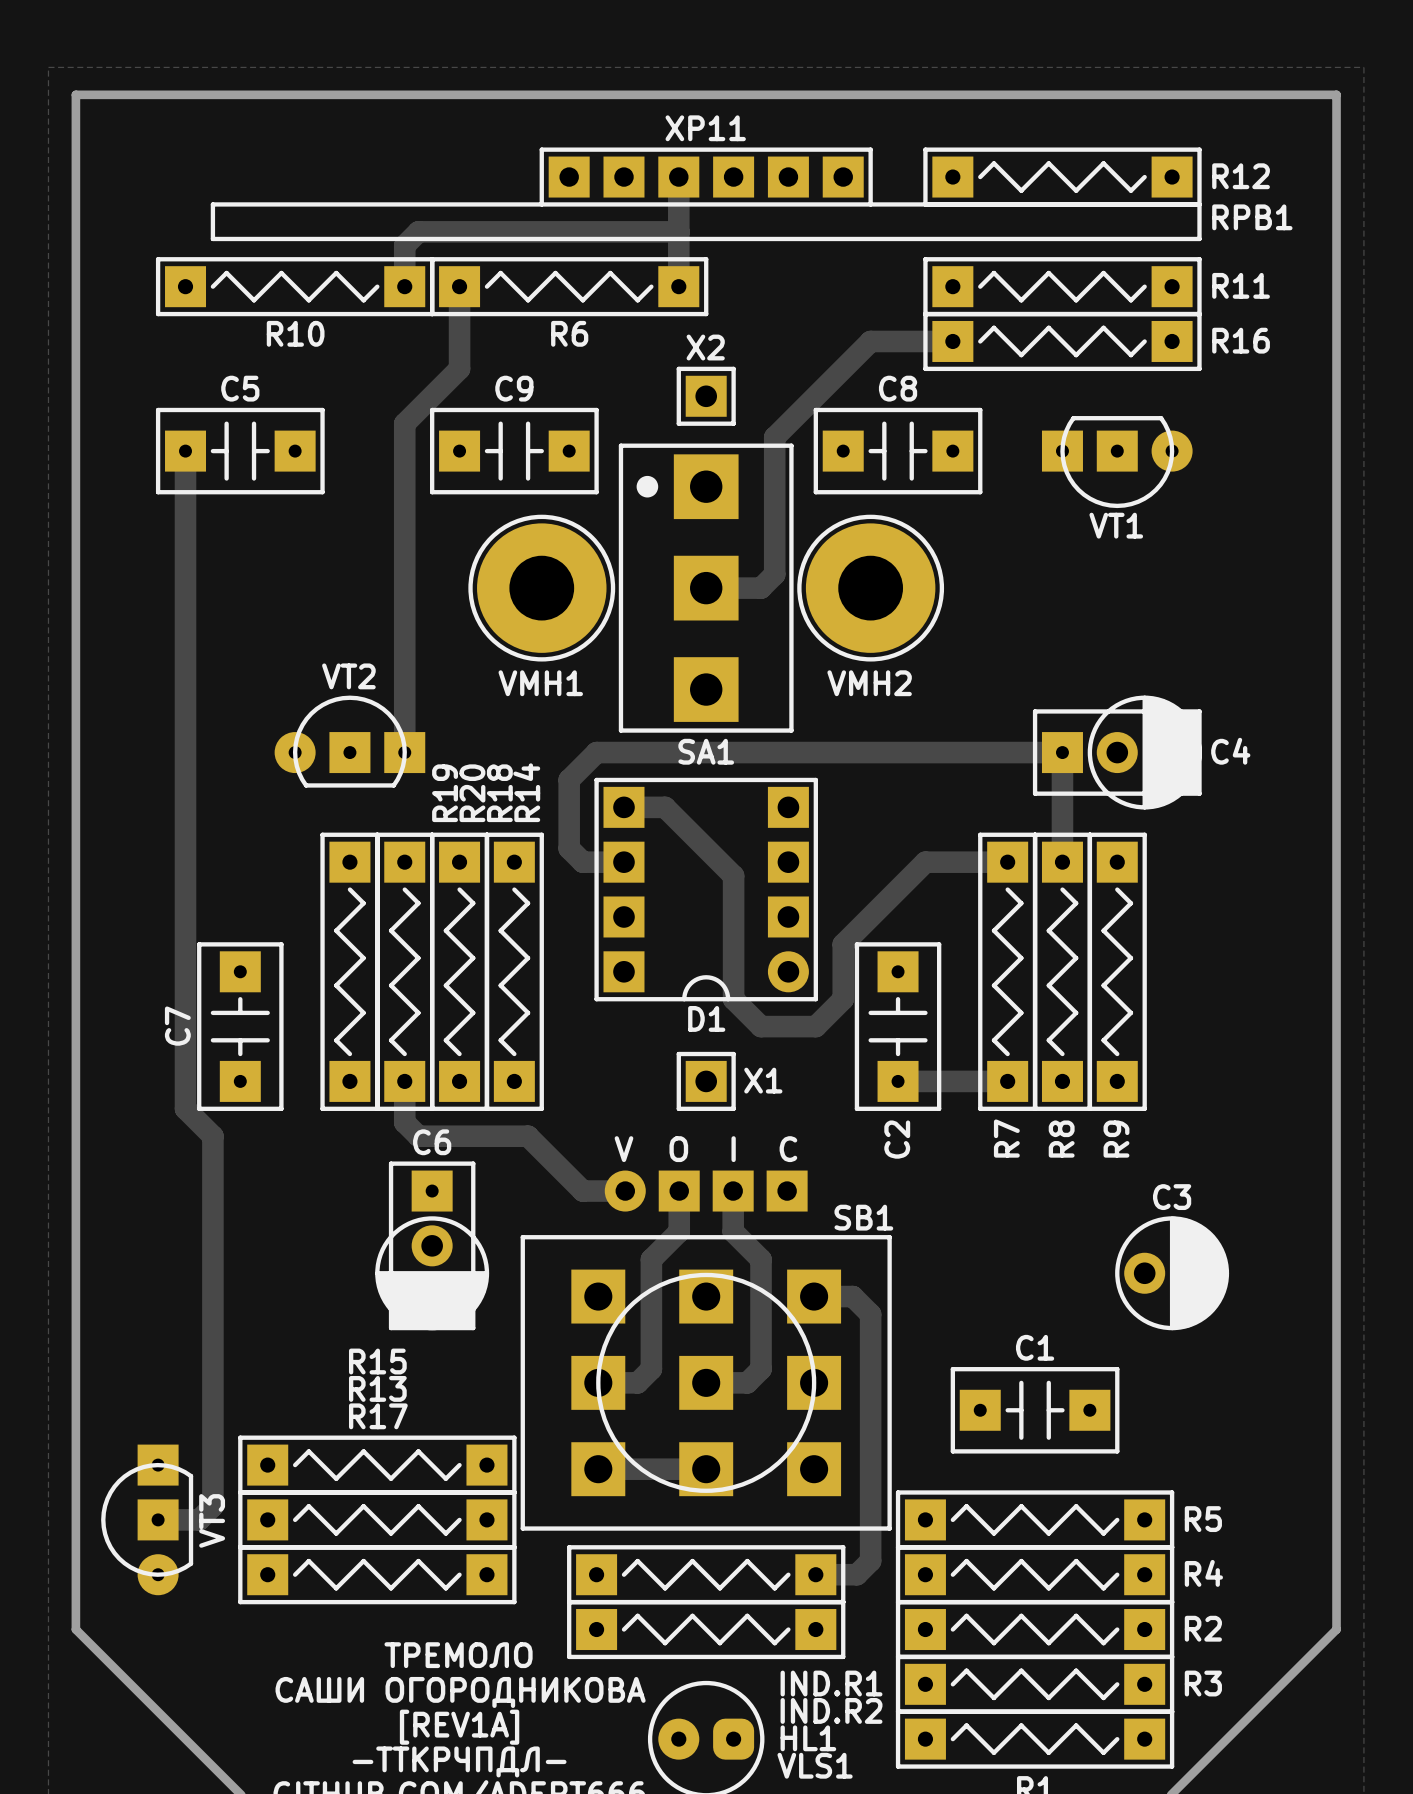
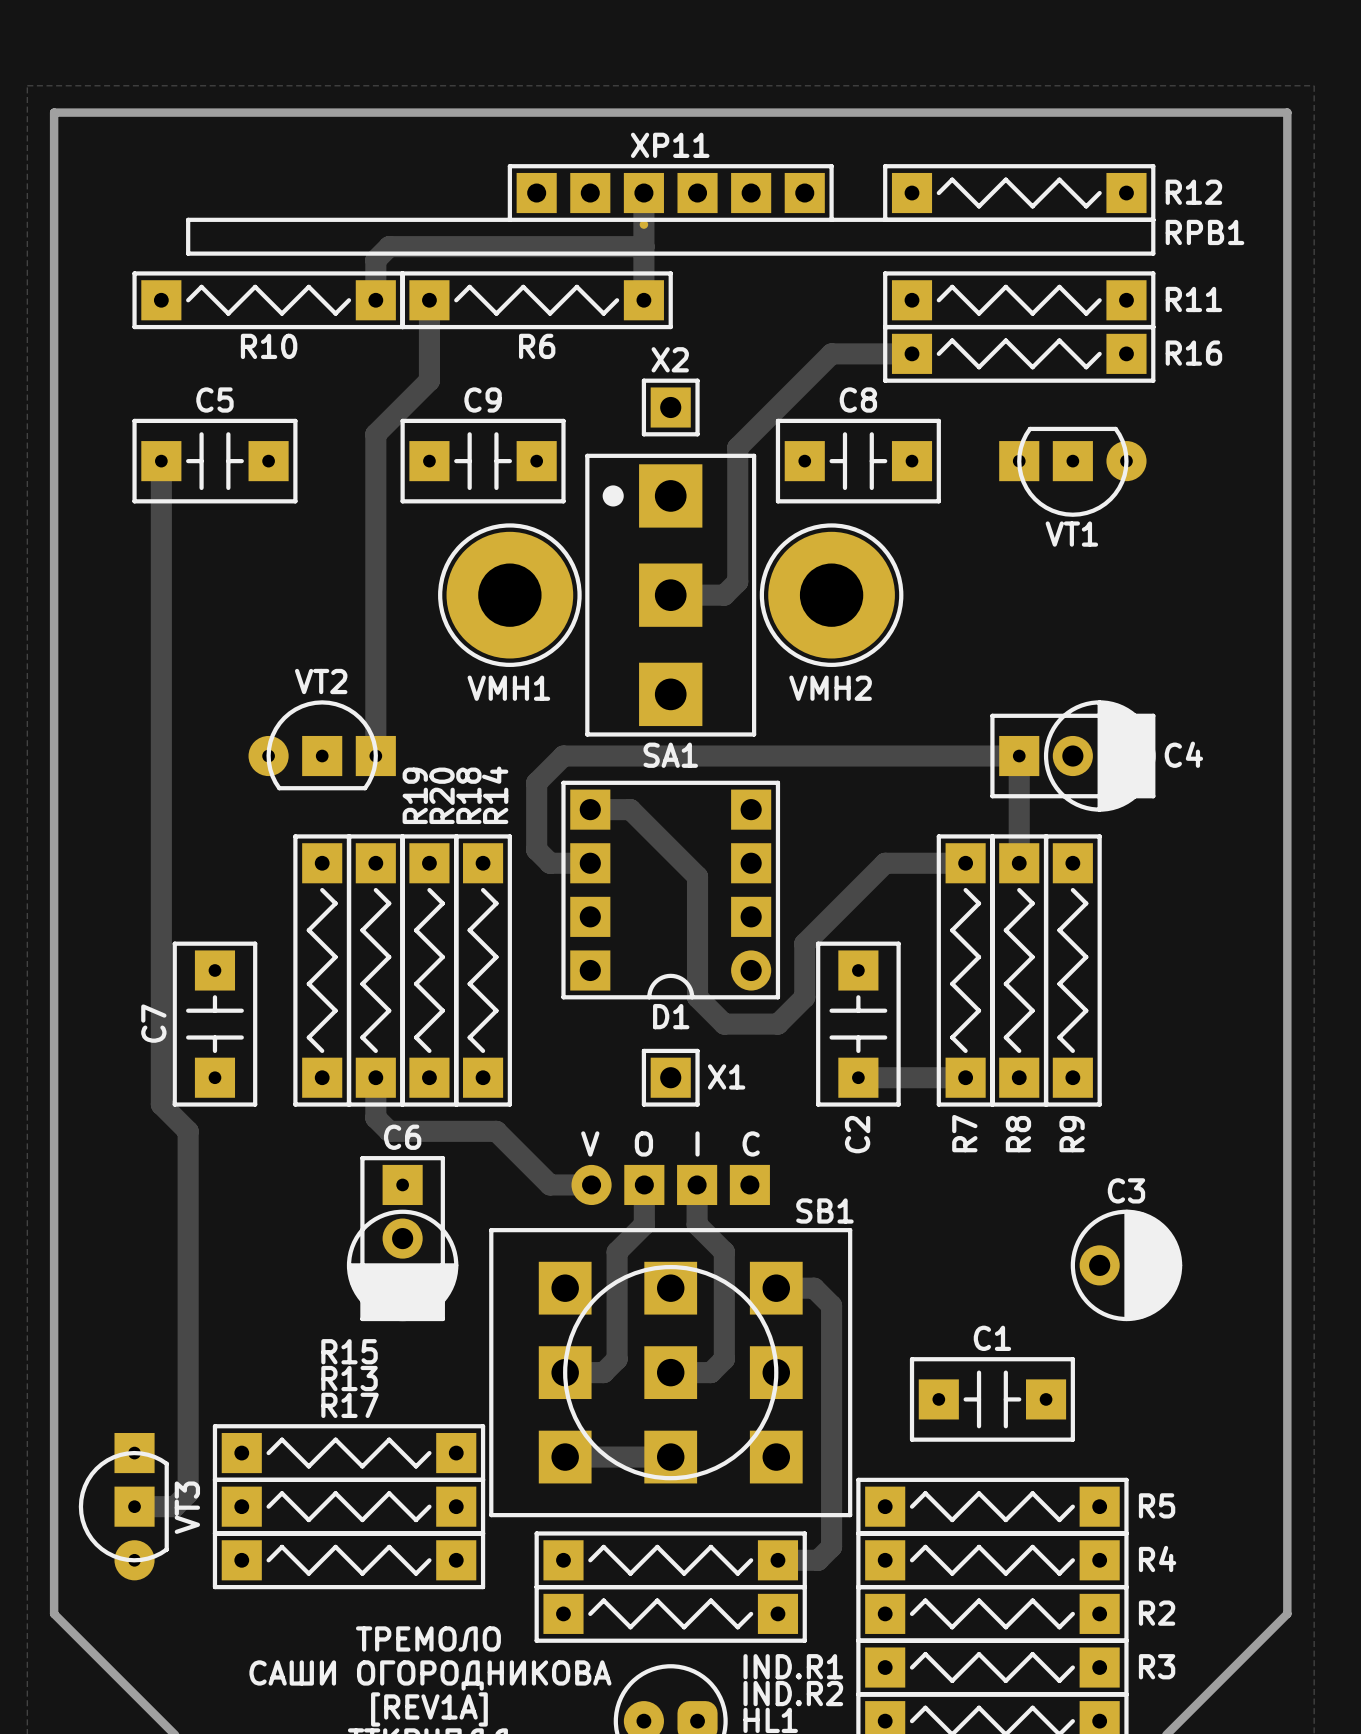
part: none -> (643, 224)

